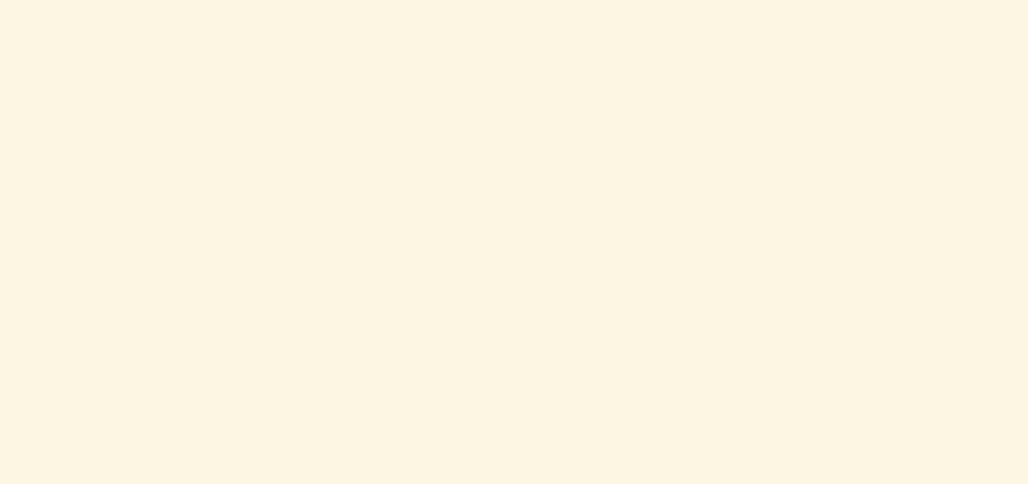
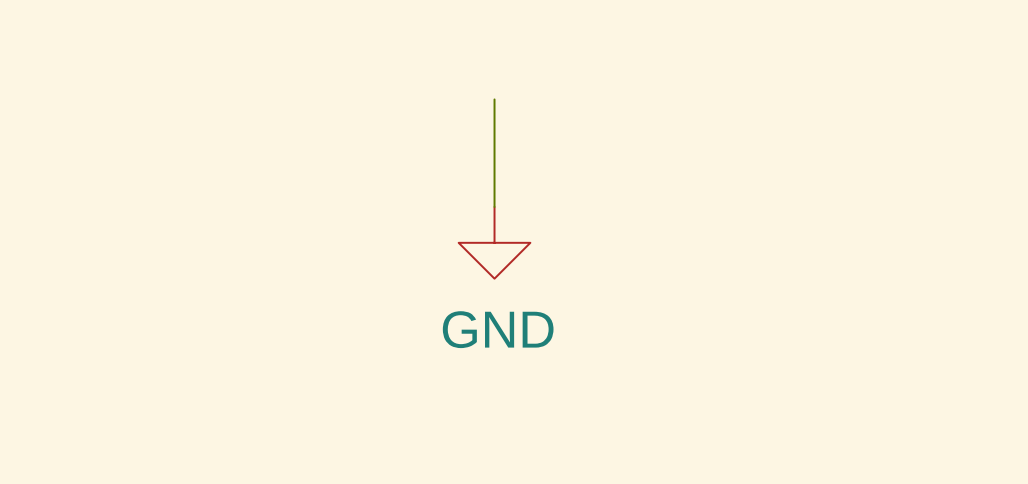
wire: none -> (494, 99) (494, 206)
power symbol: none -> GND (494, 242)

